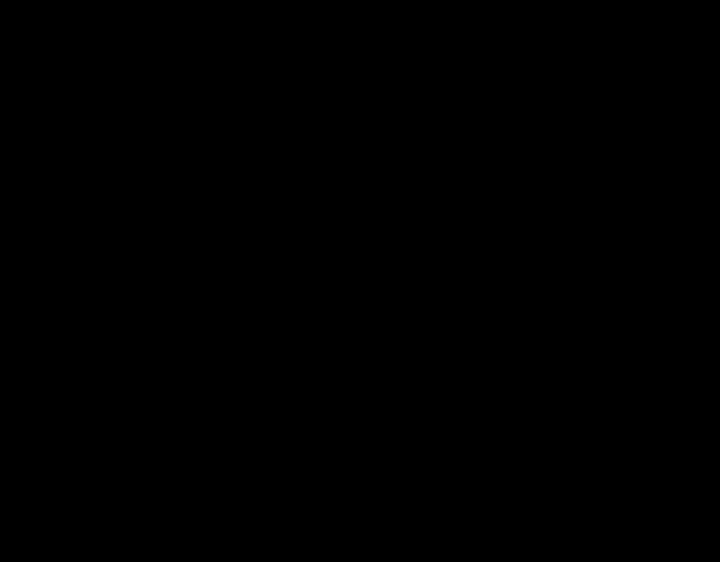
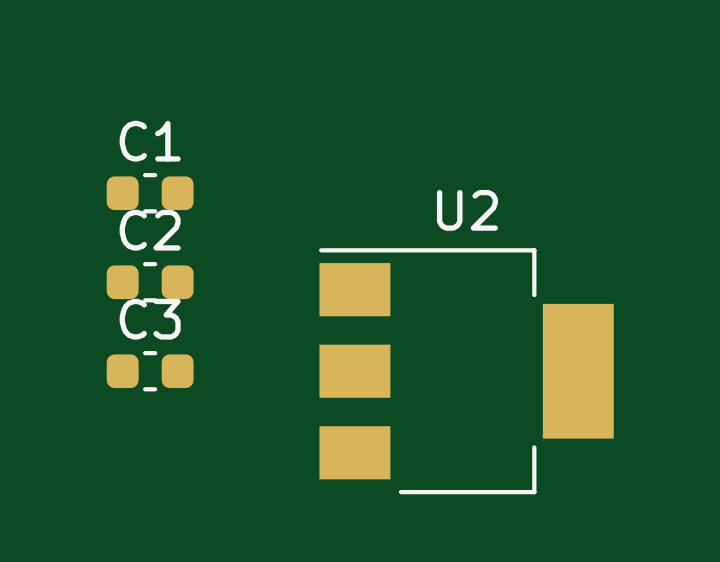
C1: none -> (150, 193)
C2: none -> (150, 282)
C3: none -> (150, 371)
U2: none -> (466, 371)

